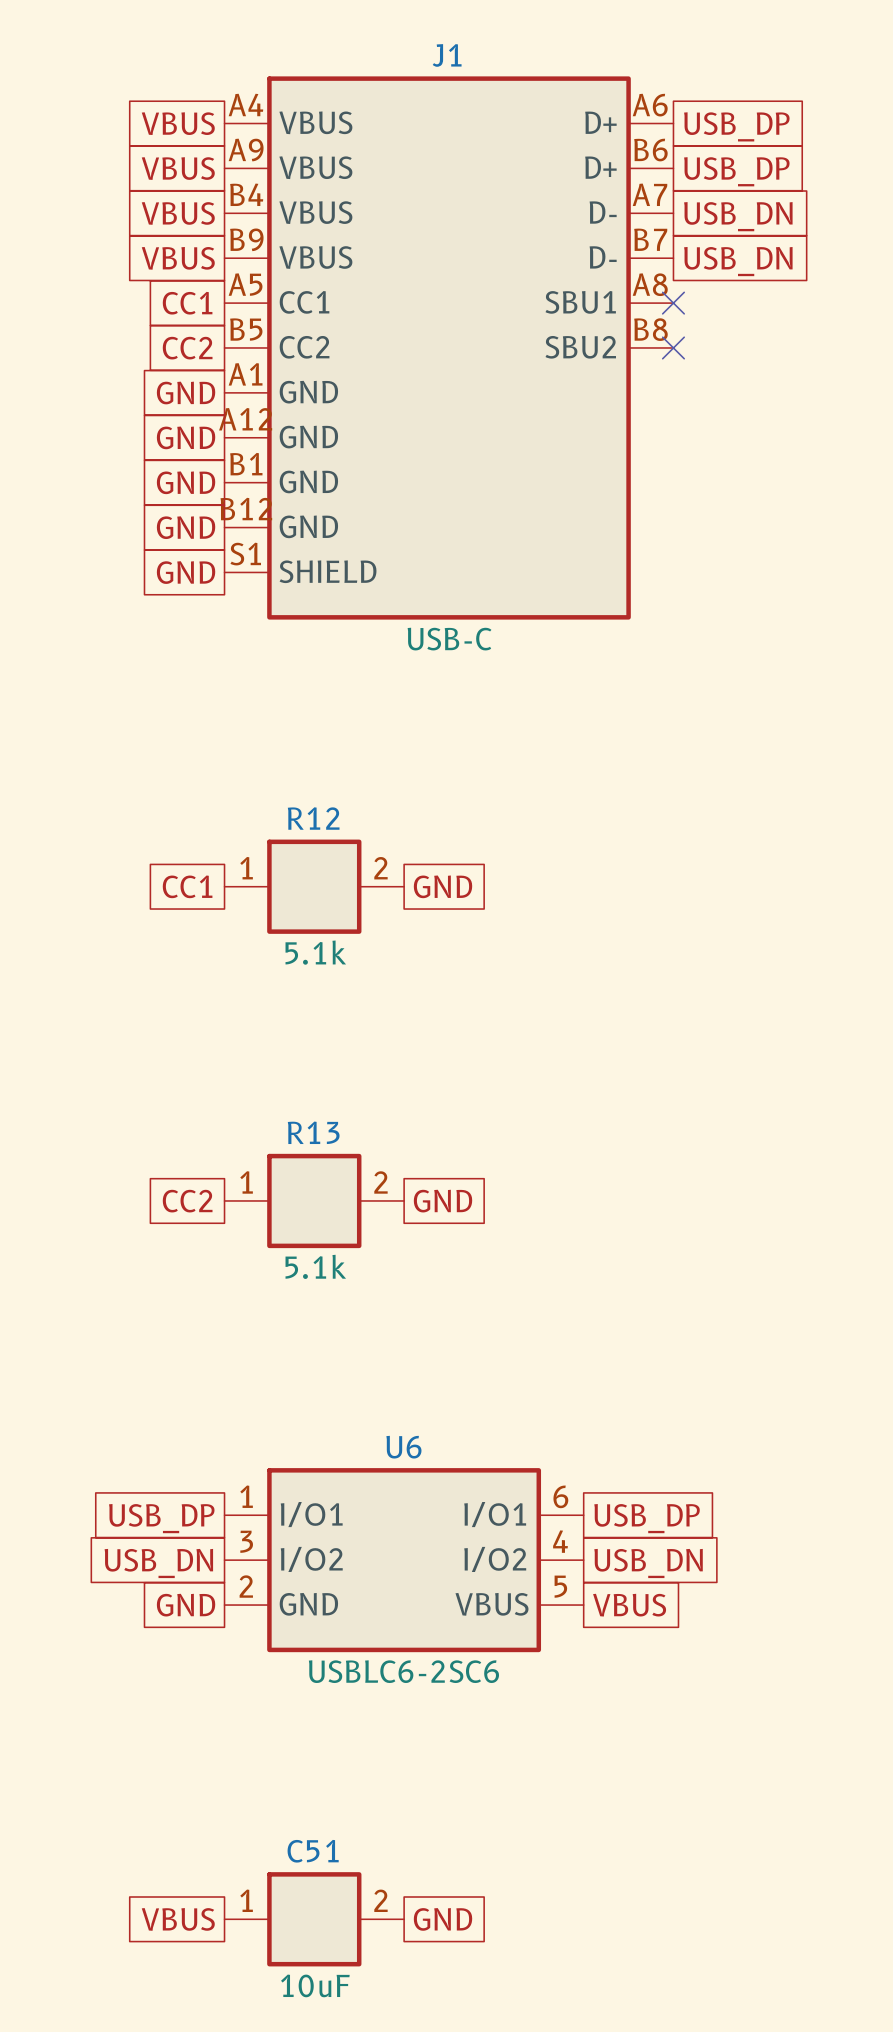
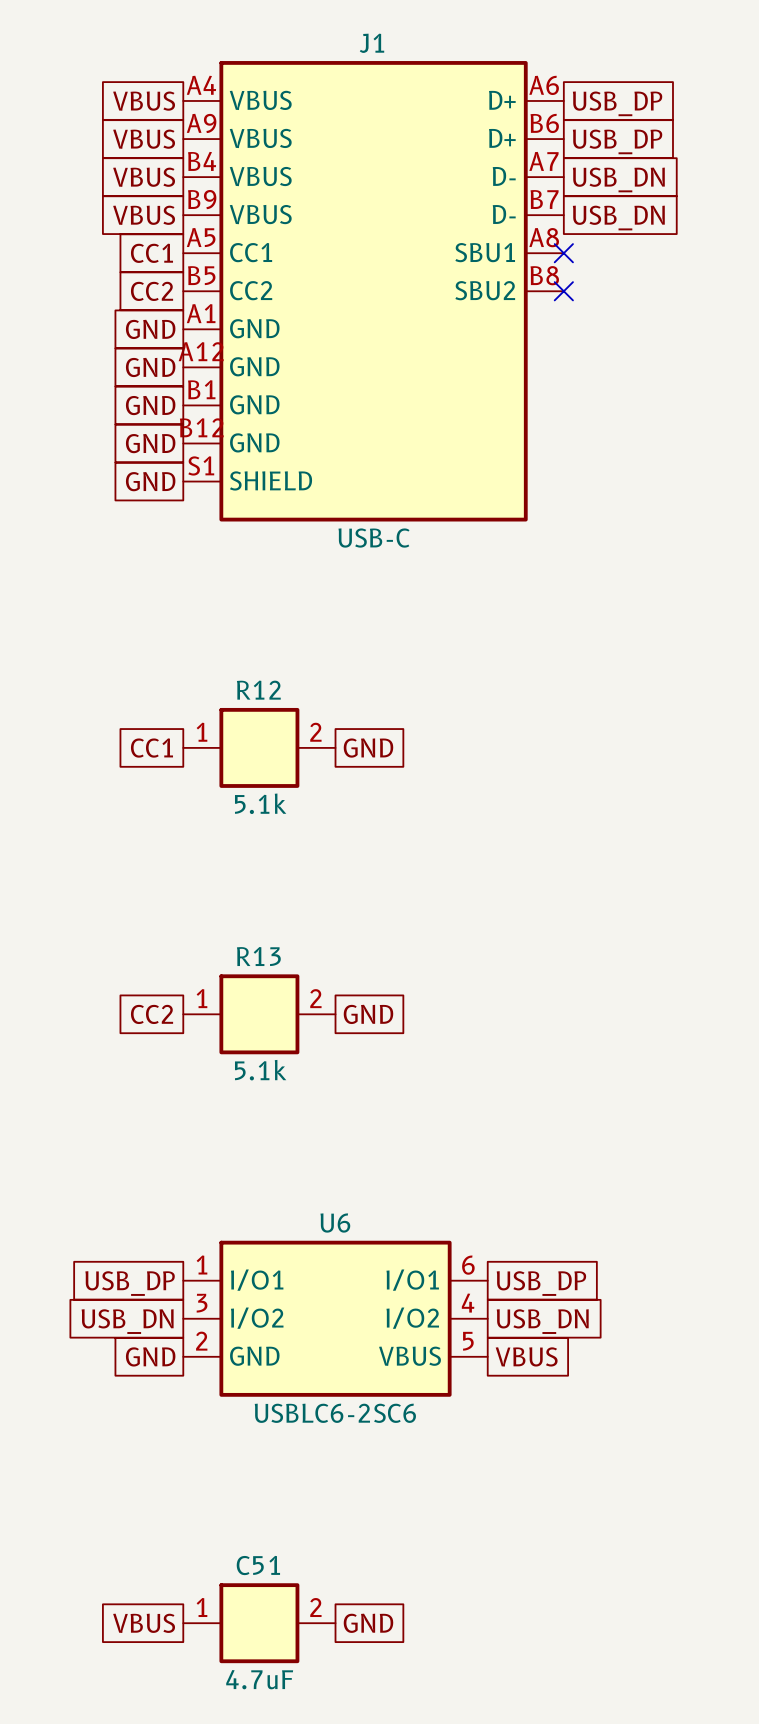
C51 value: 10uF (315, 1985) -> 4.7uF (259, 1679)

